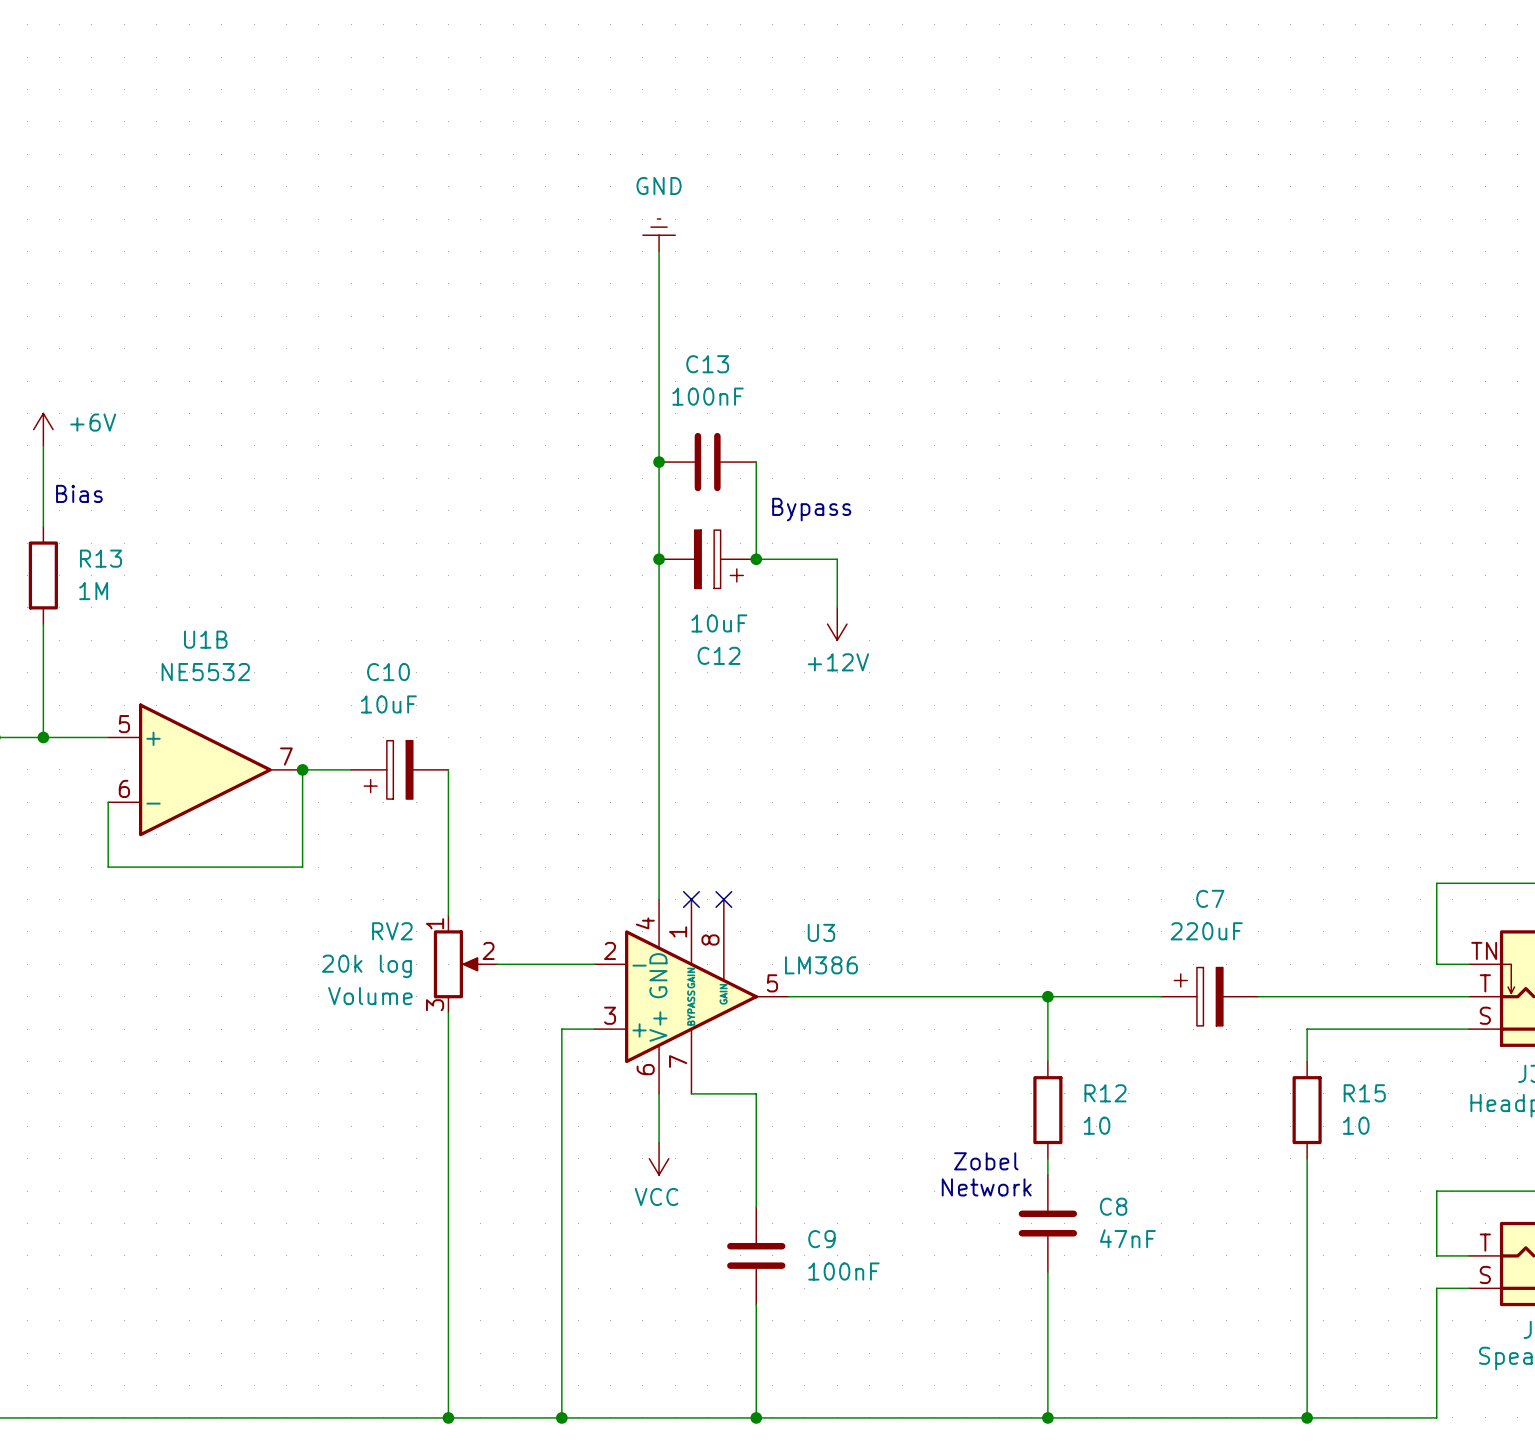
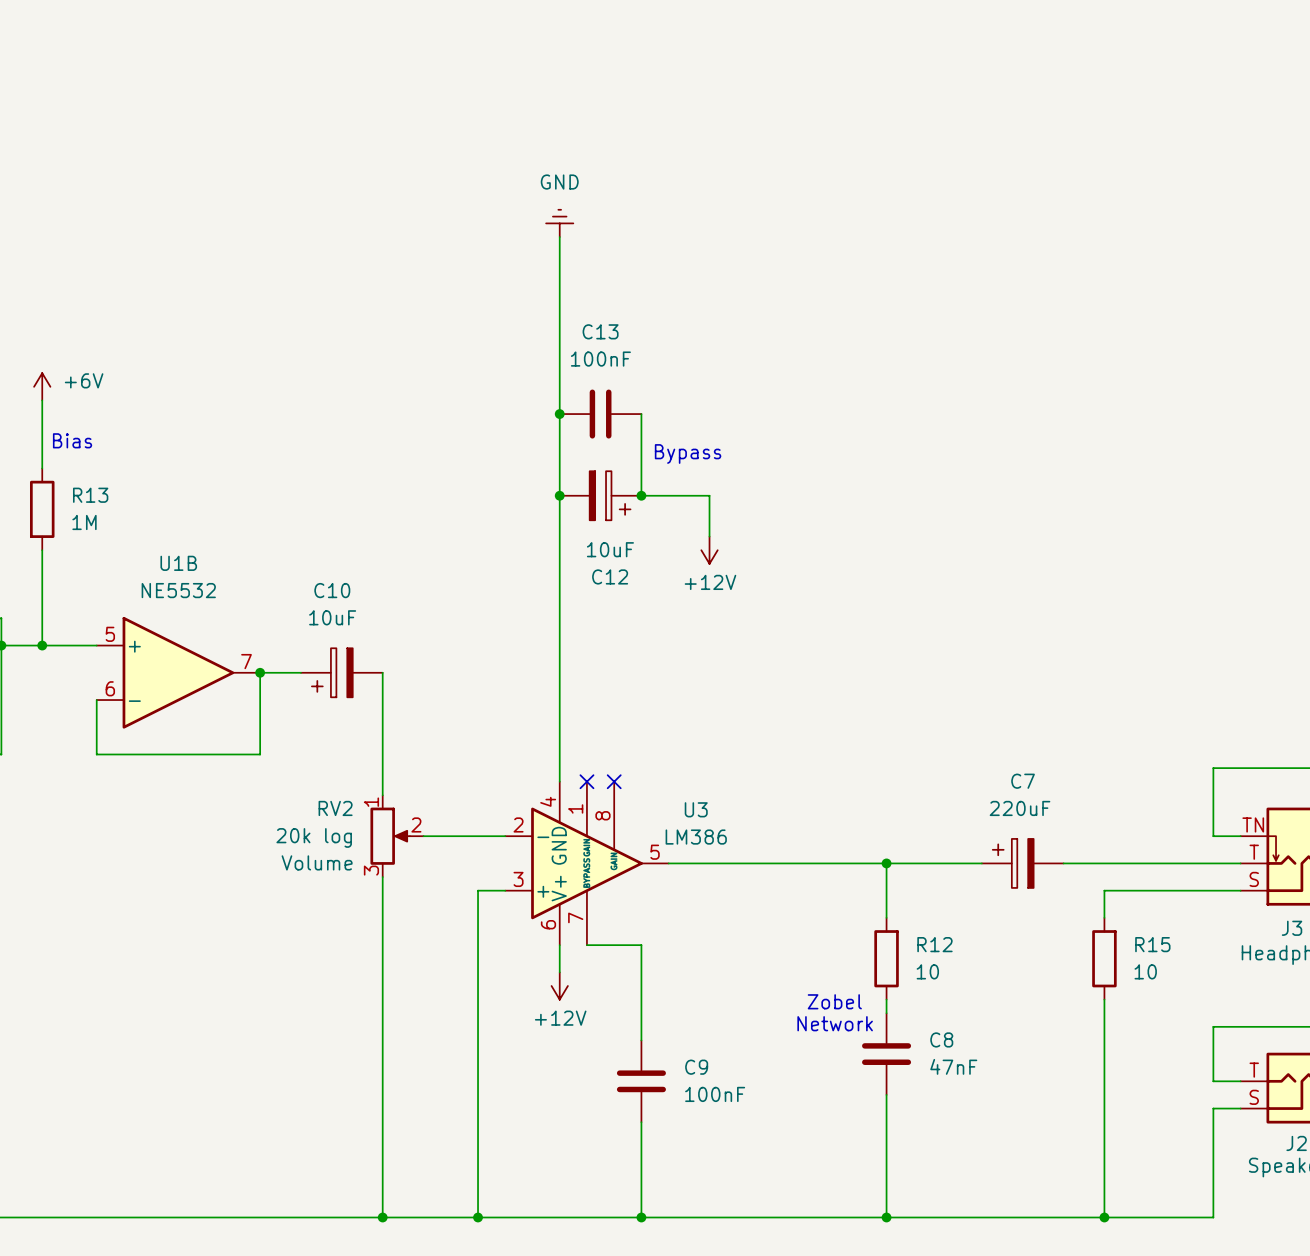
power symbol: none -> +12V (559, 985)
power symbol: VCC (659, 1158) -> none

